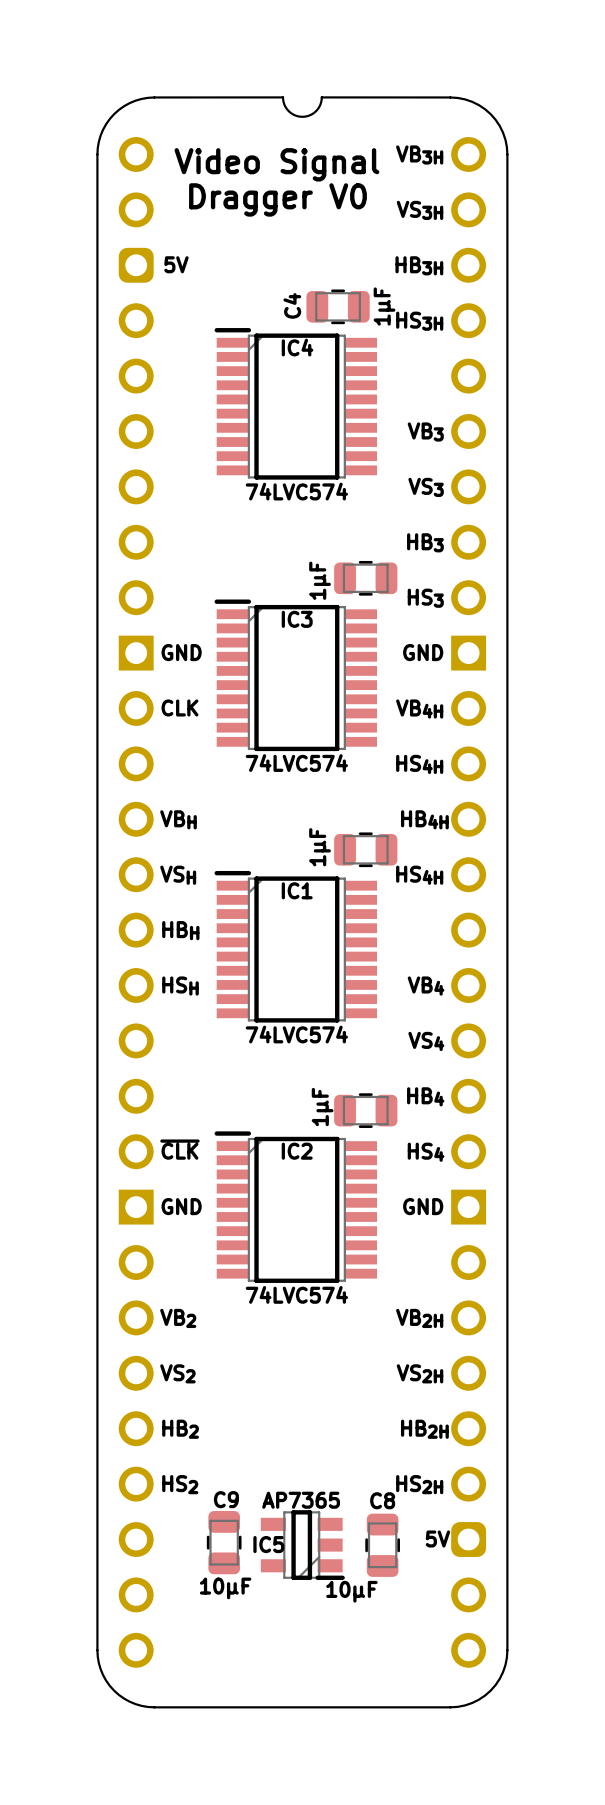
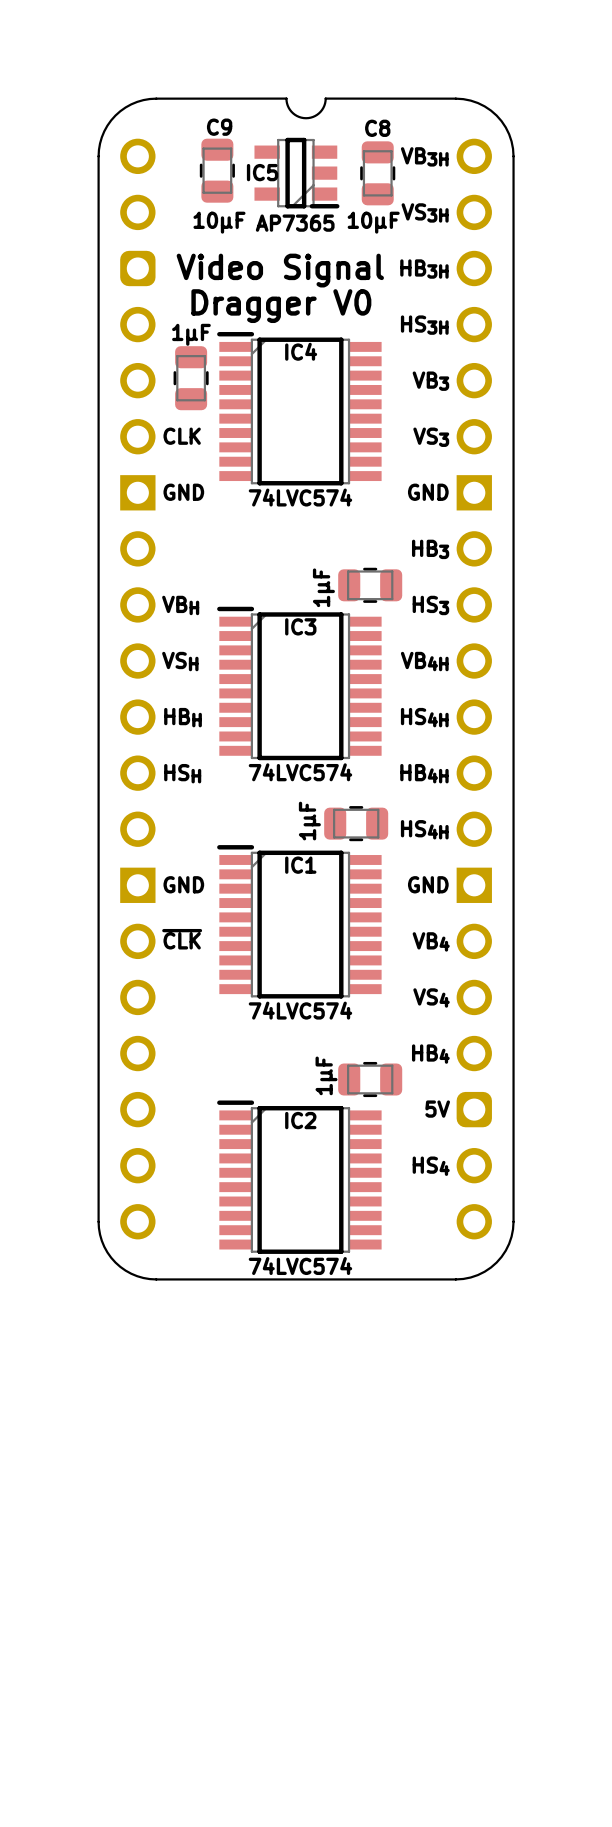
text position: Video Signal (276, 164) -> Video Signal (280, 270)
text position: Dragger V0 (277, 199) -> Dragger V0 (281, 306)
text: 5V (176, 264) -> none
C4: 1μF (338, 306) -> none
part: none -> 1μF (191, 378)
text: none -> VB3 (430, 381)
text: none -> CLK (182, 436)
text: VB3 (425, 432) -> VS3 (431, 437)
text: none -> GND (183, 492)
text: VS3 (426, 487) -> GND (428, 492)
text: GND (181, 652) -> VSH (180, 661)
text: GND (423, 652) -> VB4H (424, 661)
part: none -> (306, 689)
text: CLK (179, 707) -> HBH (183, 717)
text: VB4H (419, 709) -> HS4H (424, 717)
text: HS4H (419, 764) -> HB4H (424, 773)
text position: VBH (178, 819) -> VBH (180, 605)
text: HB4H (424, 819) -> HS4H (424, 829)
part position: (365, 849) -> (356, 823)
text: VSH (178, 875) -> GND (183, 884)
text: HS4H (419, 875) -> GND (428, 884)
part: (302, 902) -> none
text: HBH (180, 930) -> ~{CLK} (182, 939)
text: none -> VB4 (431, 941)
IC1 position: (295, 946) -> (299, 921)
text position: HSH (180, 986) -> HSH (182, 773)
text: VB4 (426, 986) -> VS4 (431, 997)
text: VS4 (426, 1041) -> HB4 (430, 1054)
text: HB4 (425, 1096) -> 5V (437, 1109)
part position: (365, 1110) -> (370, 1079)
text: ~{CLK} (179, 1149) -> none
text: GND (181, 1206) -> none
text: GND (423, 1206) -> none
IC2 position: (295, 1207) -> (299, 1177)
text: VB2 (178, 1318) -> none
text: VB2H (419, 1318) -> none
text: VS2 (177, 1373) -> none
text: VS2H (420, 1373) -> none
text: HB2 (180, 1429) -> none
text: HB2H (424, 1429) -> none
text: HS2 (180, 1484) -> none
text: HS2H (419, 1484) -> none
IC5 text position: AP7365 (301, 1500) -> AP7365 (295, 223)
text: 5V (437, 1539) -> none
C9 position: (224, 1542) -> (217, 170)
IC5 position: (302, 1545) -> (296, 173)
C8 position: (382, 1545) -> (377, 173)
C9 value position: 10µF (225, 1588) -> 10µF (219, 222)
C8 value position: 10µF (351, 1591) -> 10µF (373, 222)

